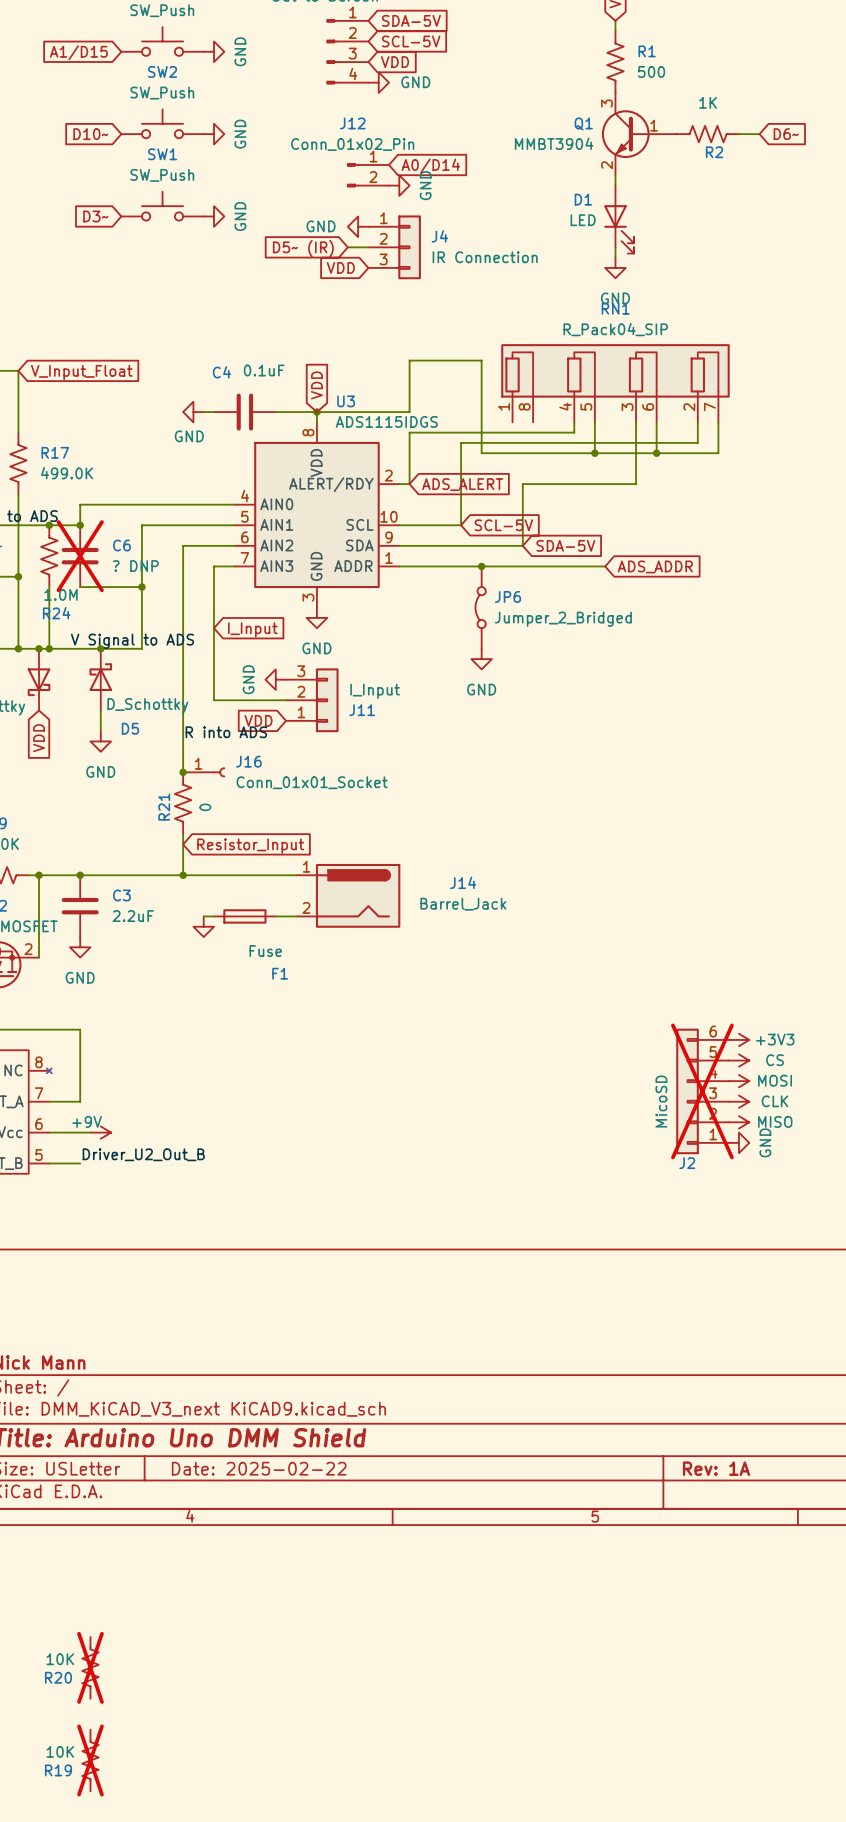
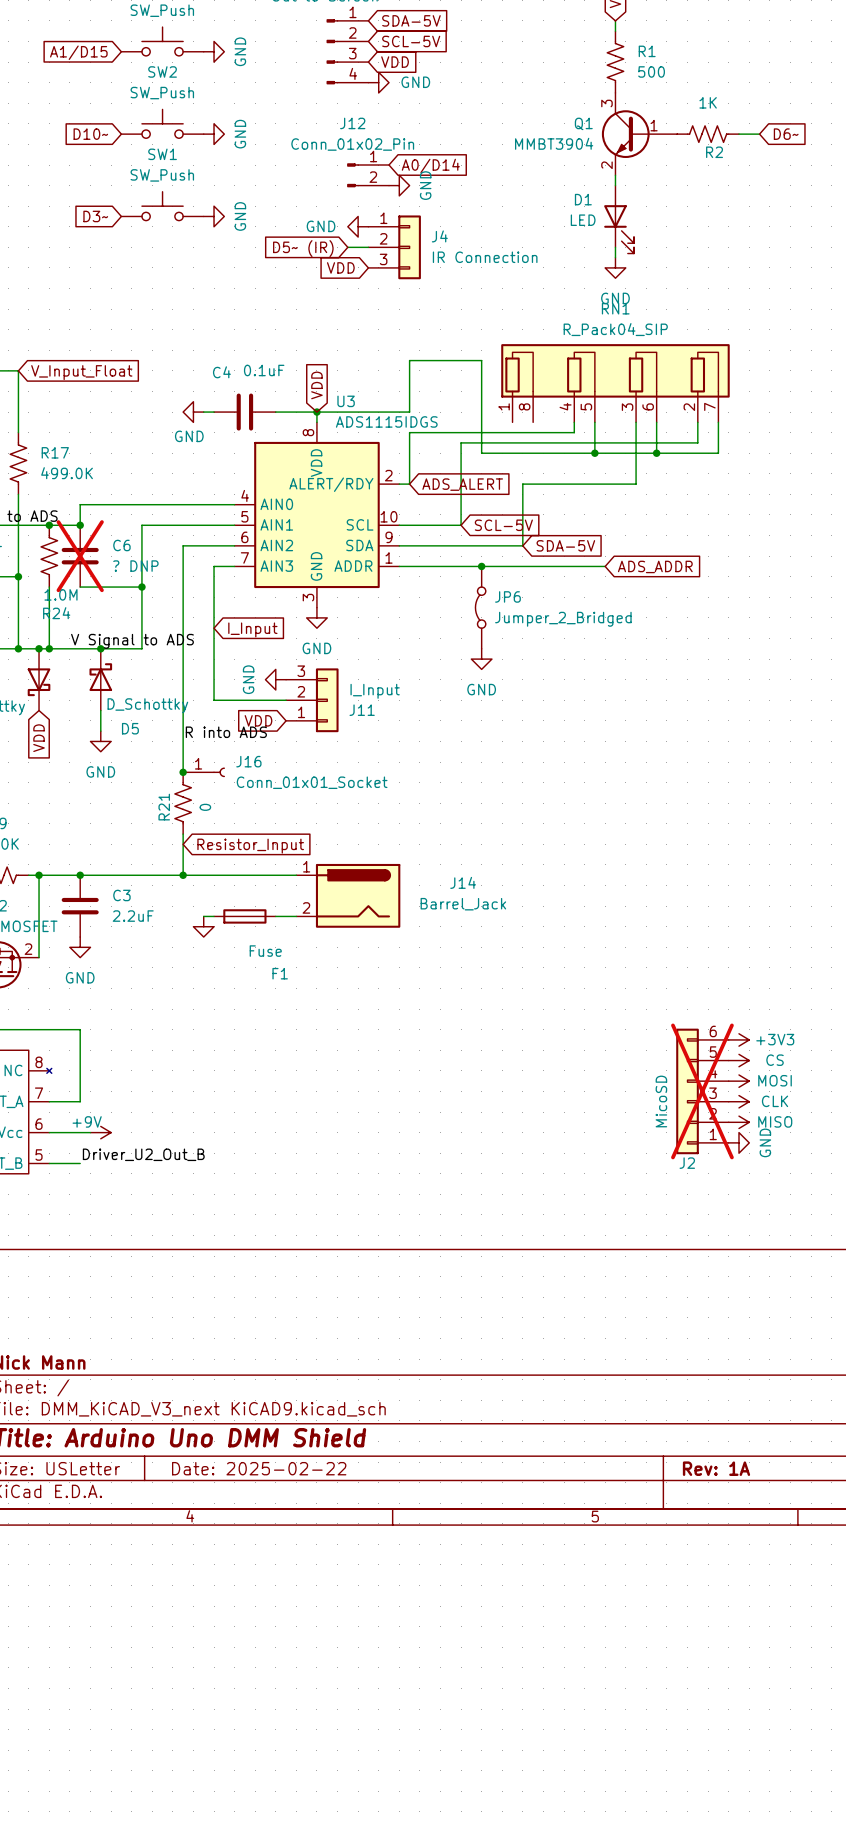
R20: 10K (90, 1667) -> none
R19: 10K (90, 1760) -> none

